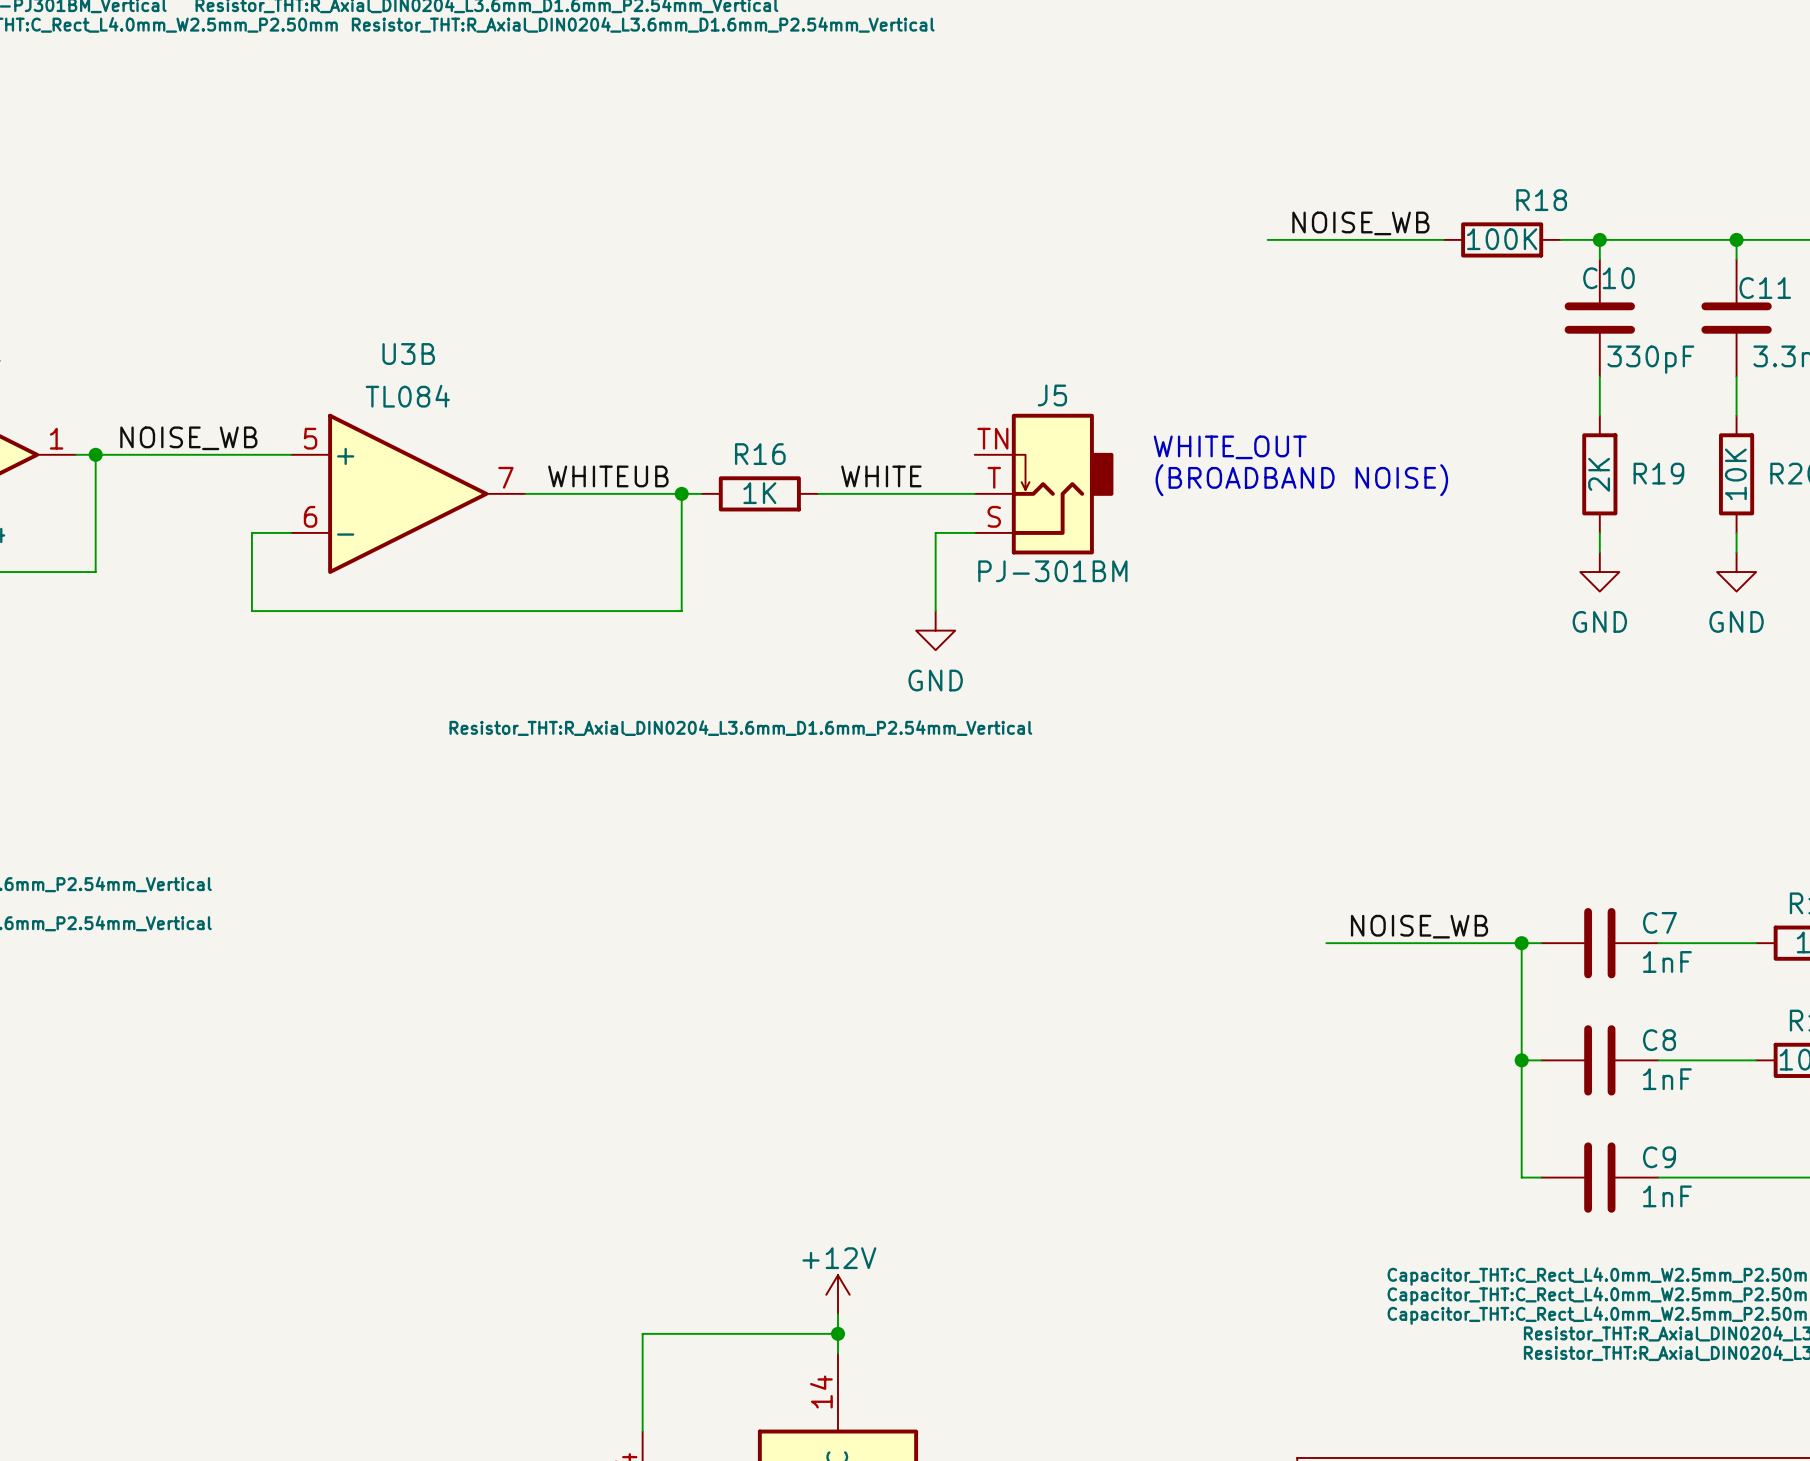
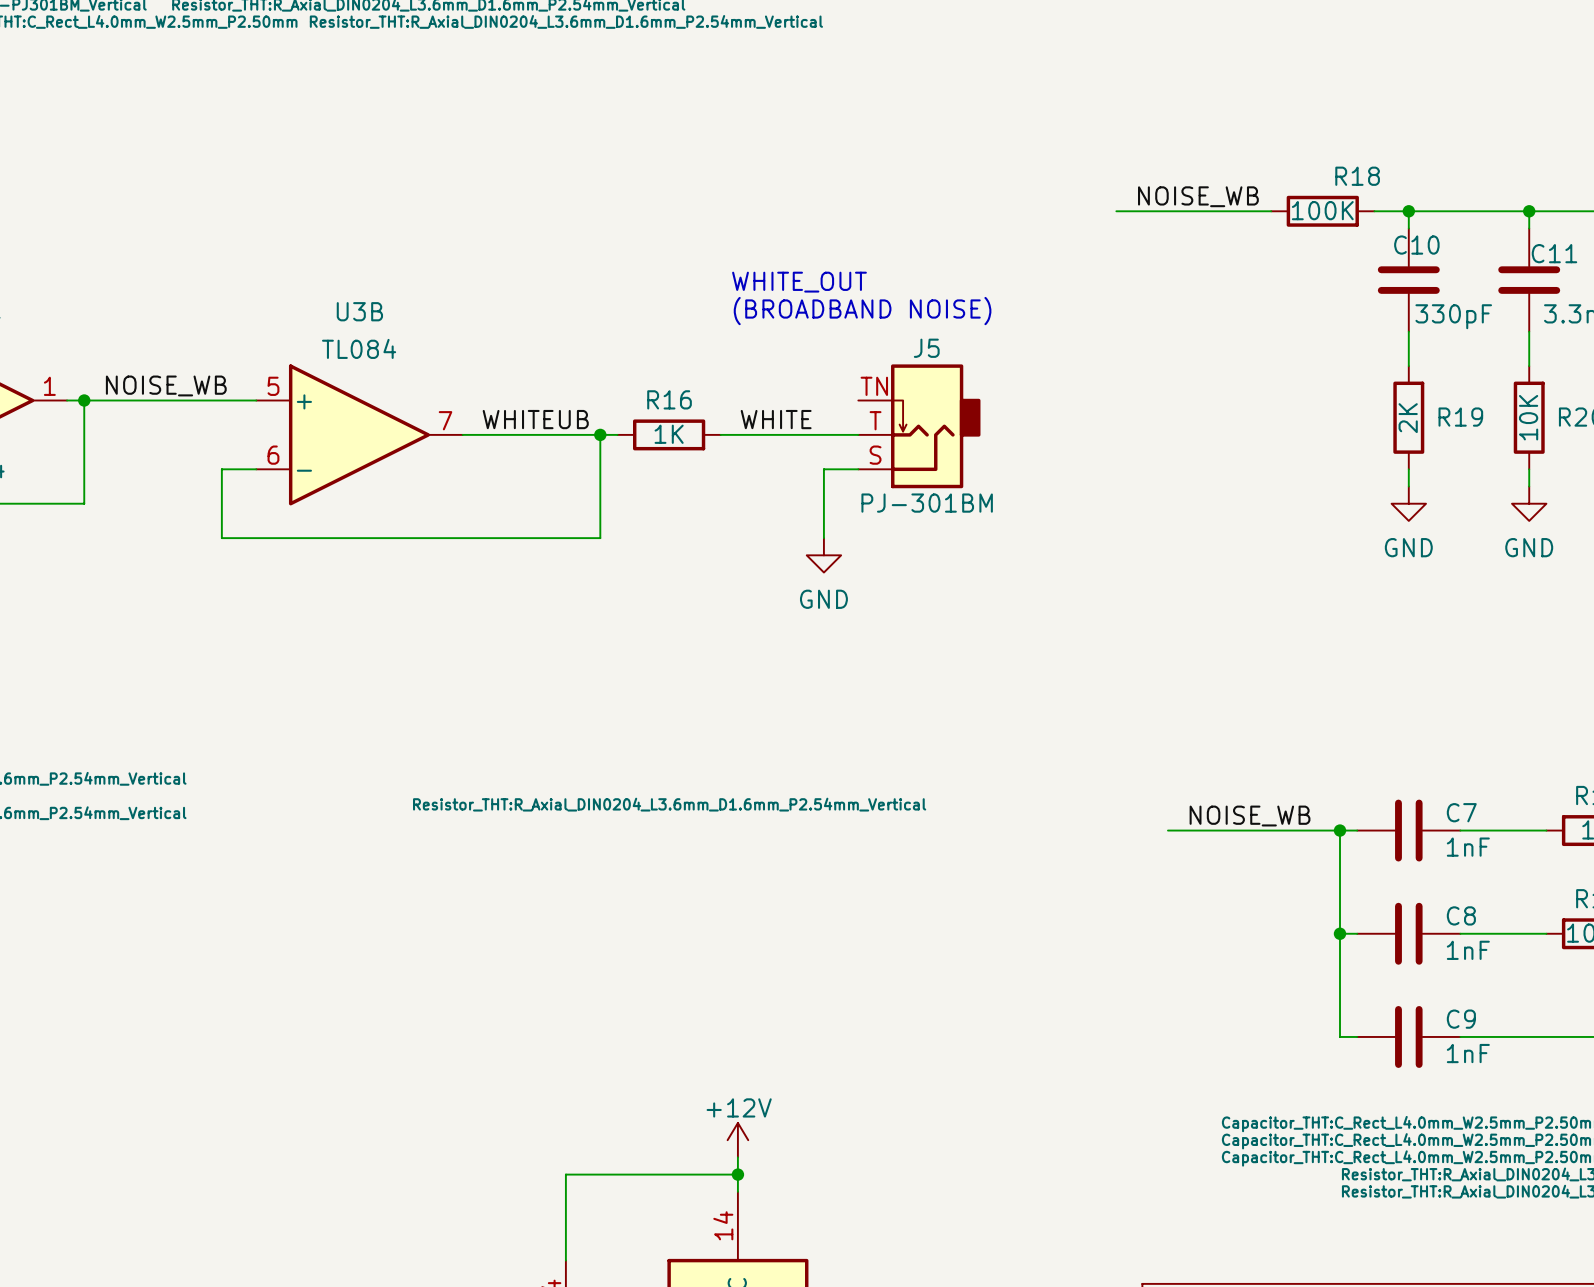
text position: WHITE_OUT (1230, 447) -> WHITE_OUT (799, 282)
text position: (BROADBAND NOISE) (1301, 480) -> (BROADBAND NOISE) (862, 311)
R16 text position: Resistor_THT:R_Axial_DIN0204_L3.6mm_D1.6mm_P2.54mm_Vertical (740, 728) -> Resistor_THT:R_Axial_DIN0204_L3.6mm_D1.6mm_P2.54mm_Vertical (669, 804)

